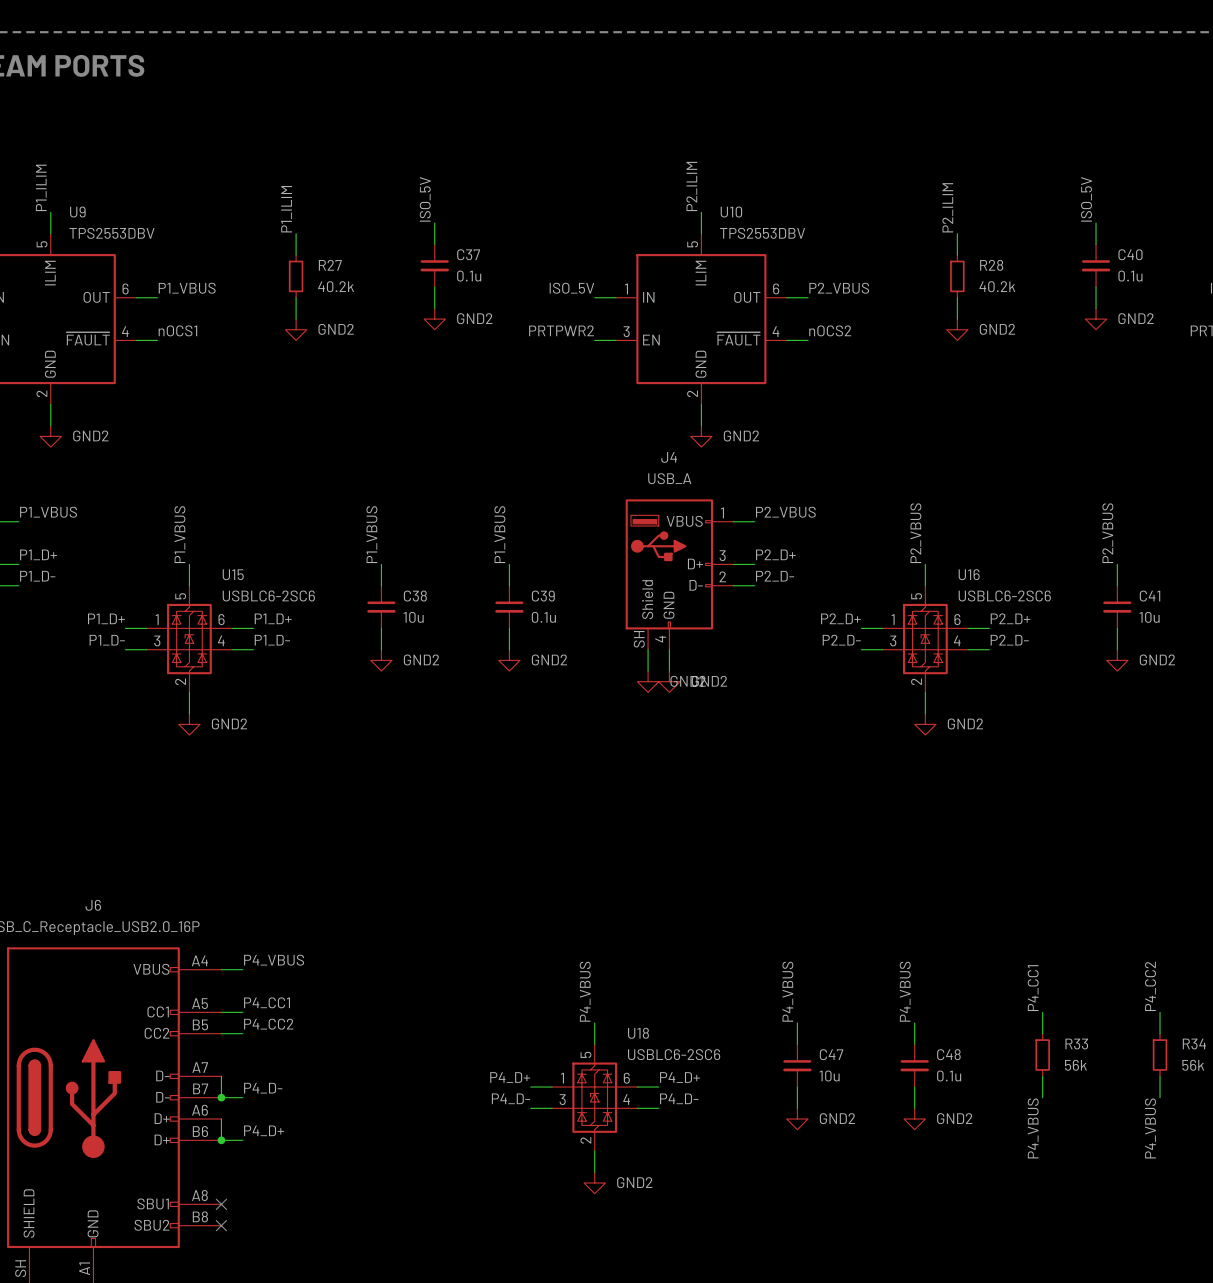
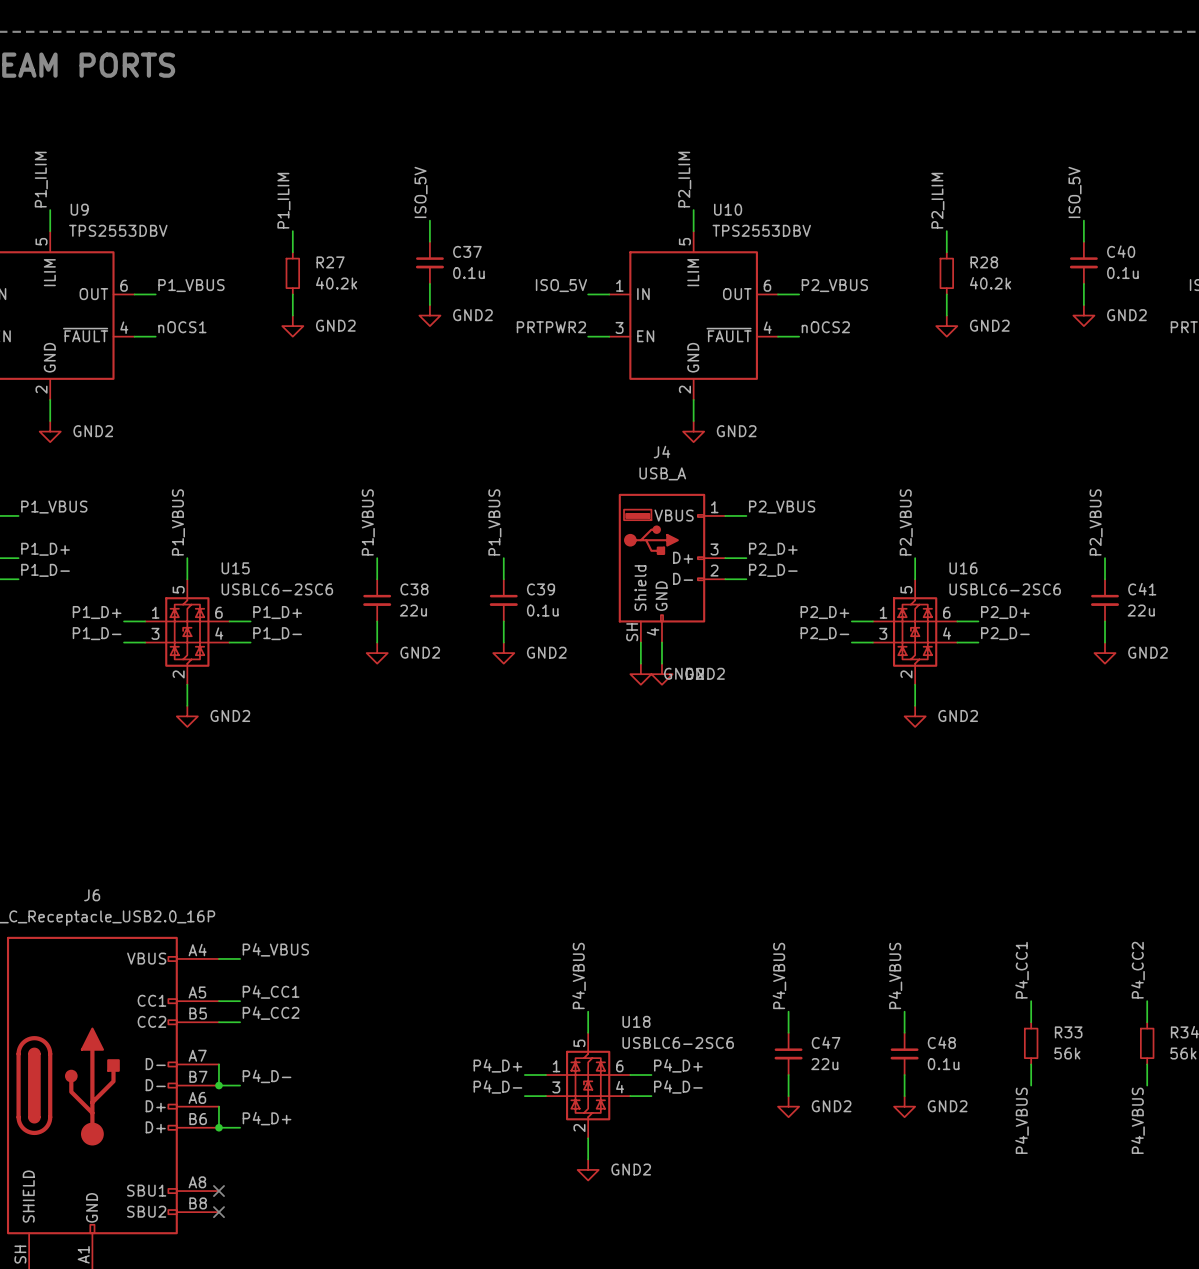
C38 value: 10u (413, 617) -> 22u (413, 610)
C41 value: 10u (1149, 617) -> 22u (1141, 610)
C47 value: 10u (829, 1076) -> 22u (824, 1064)

